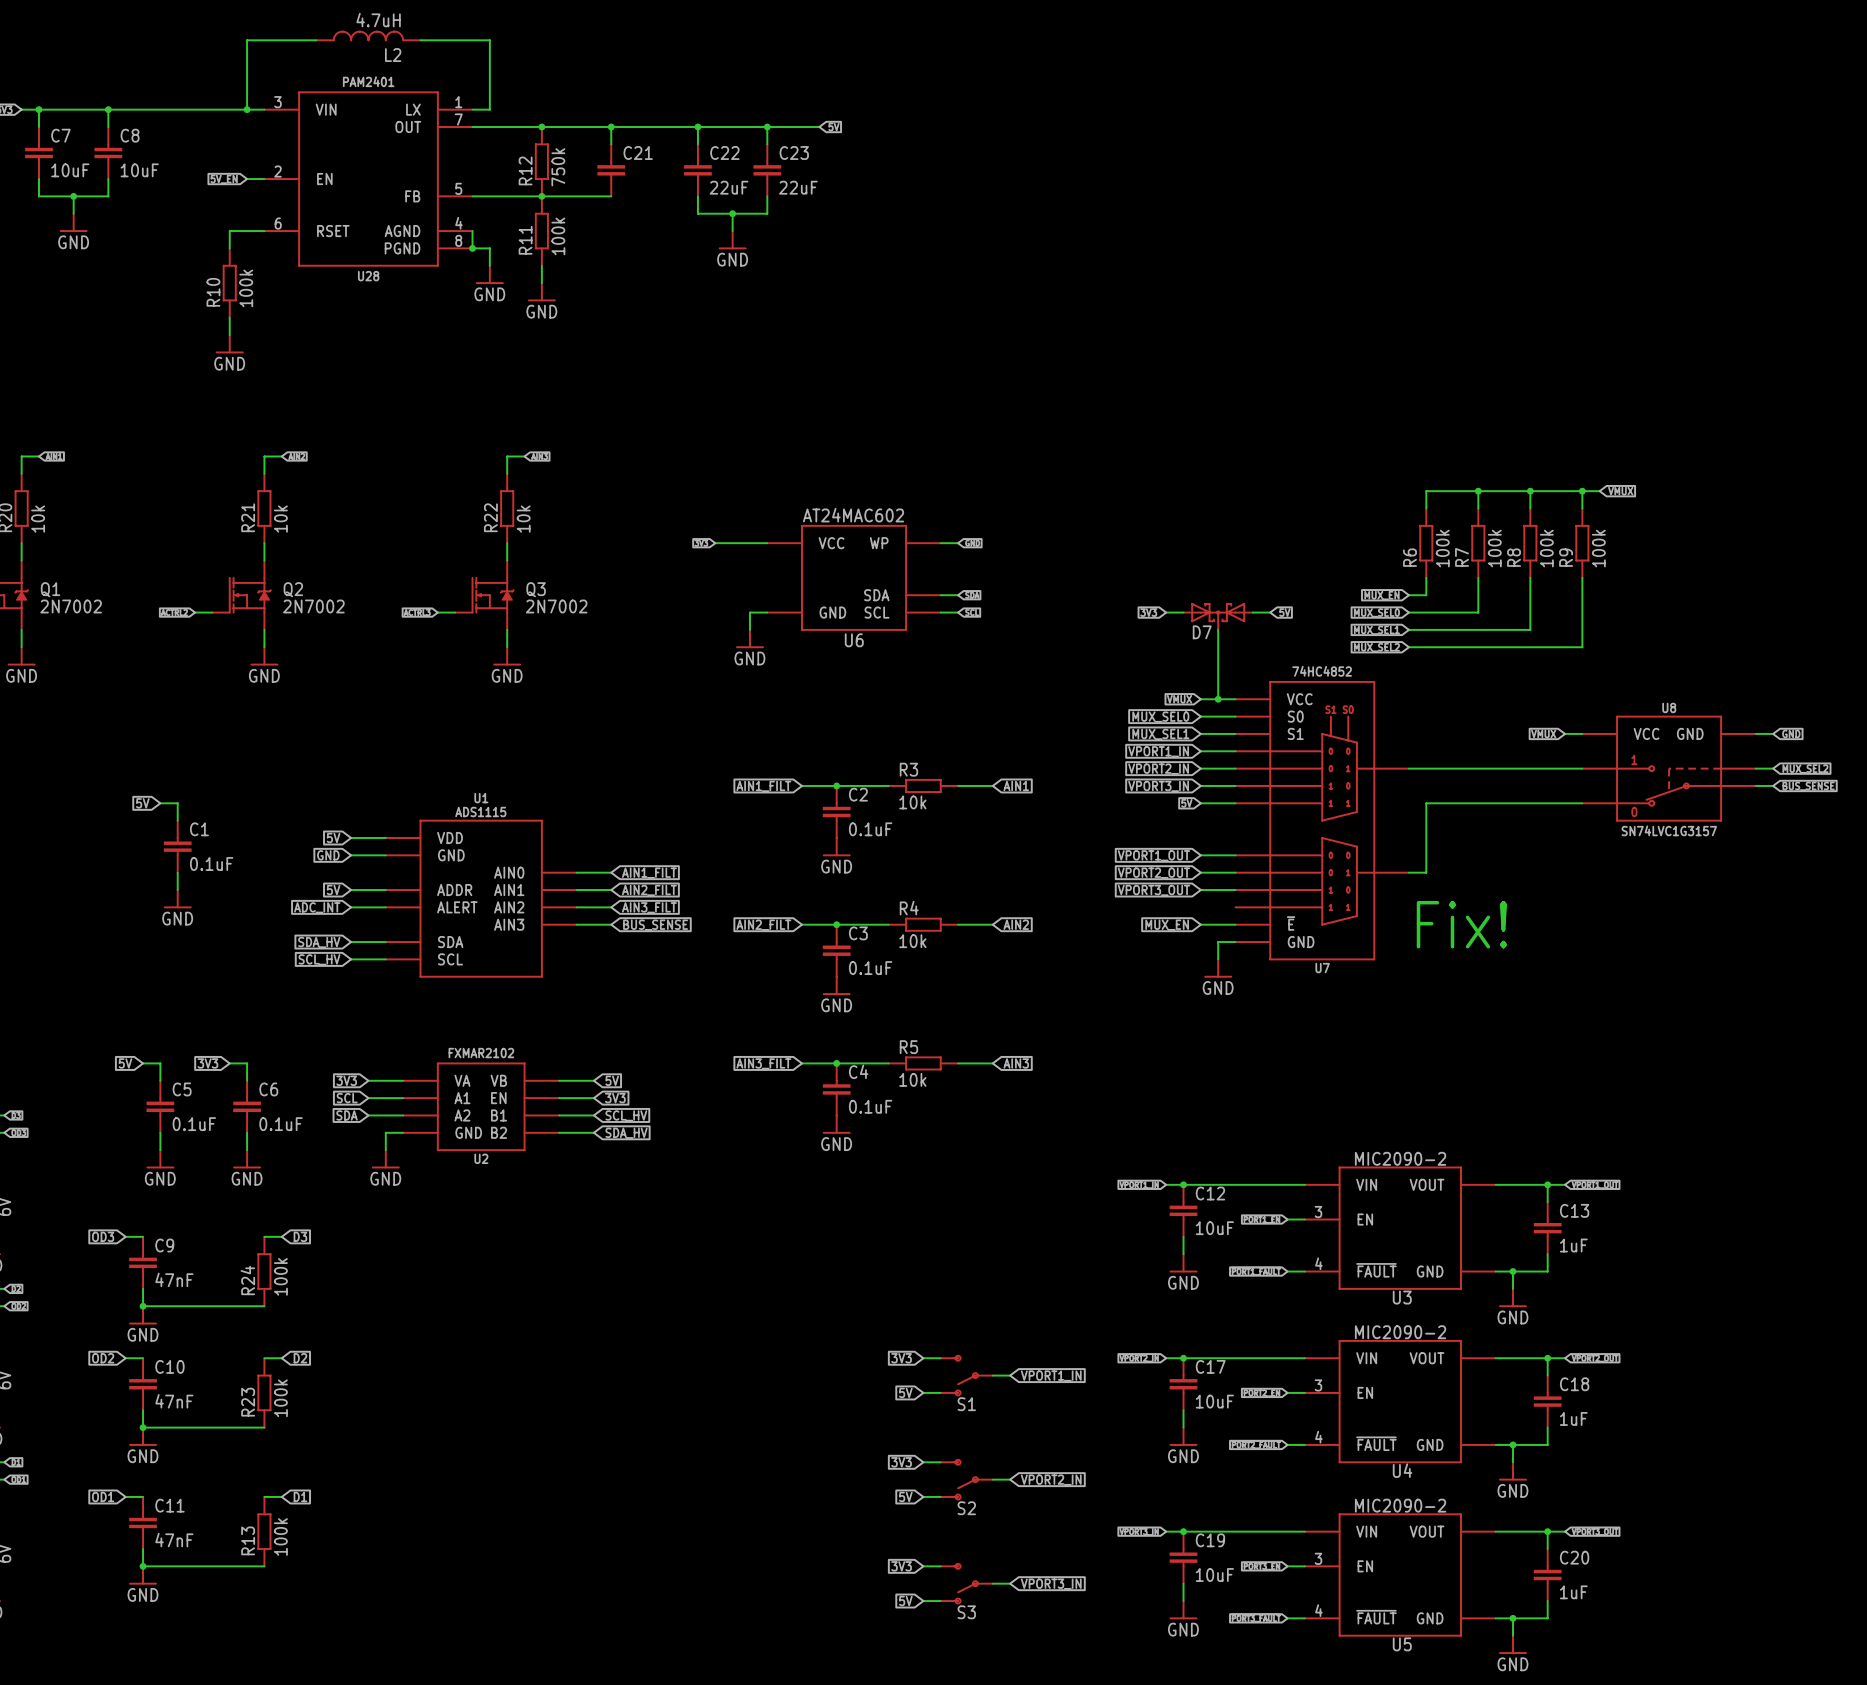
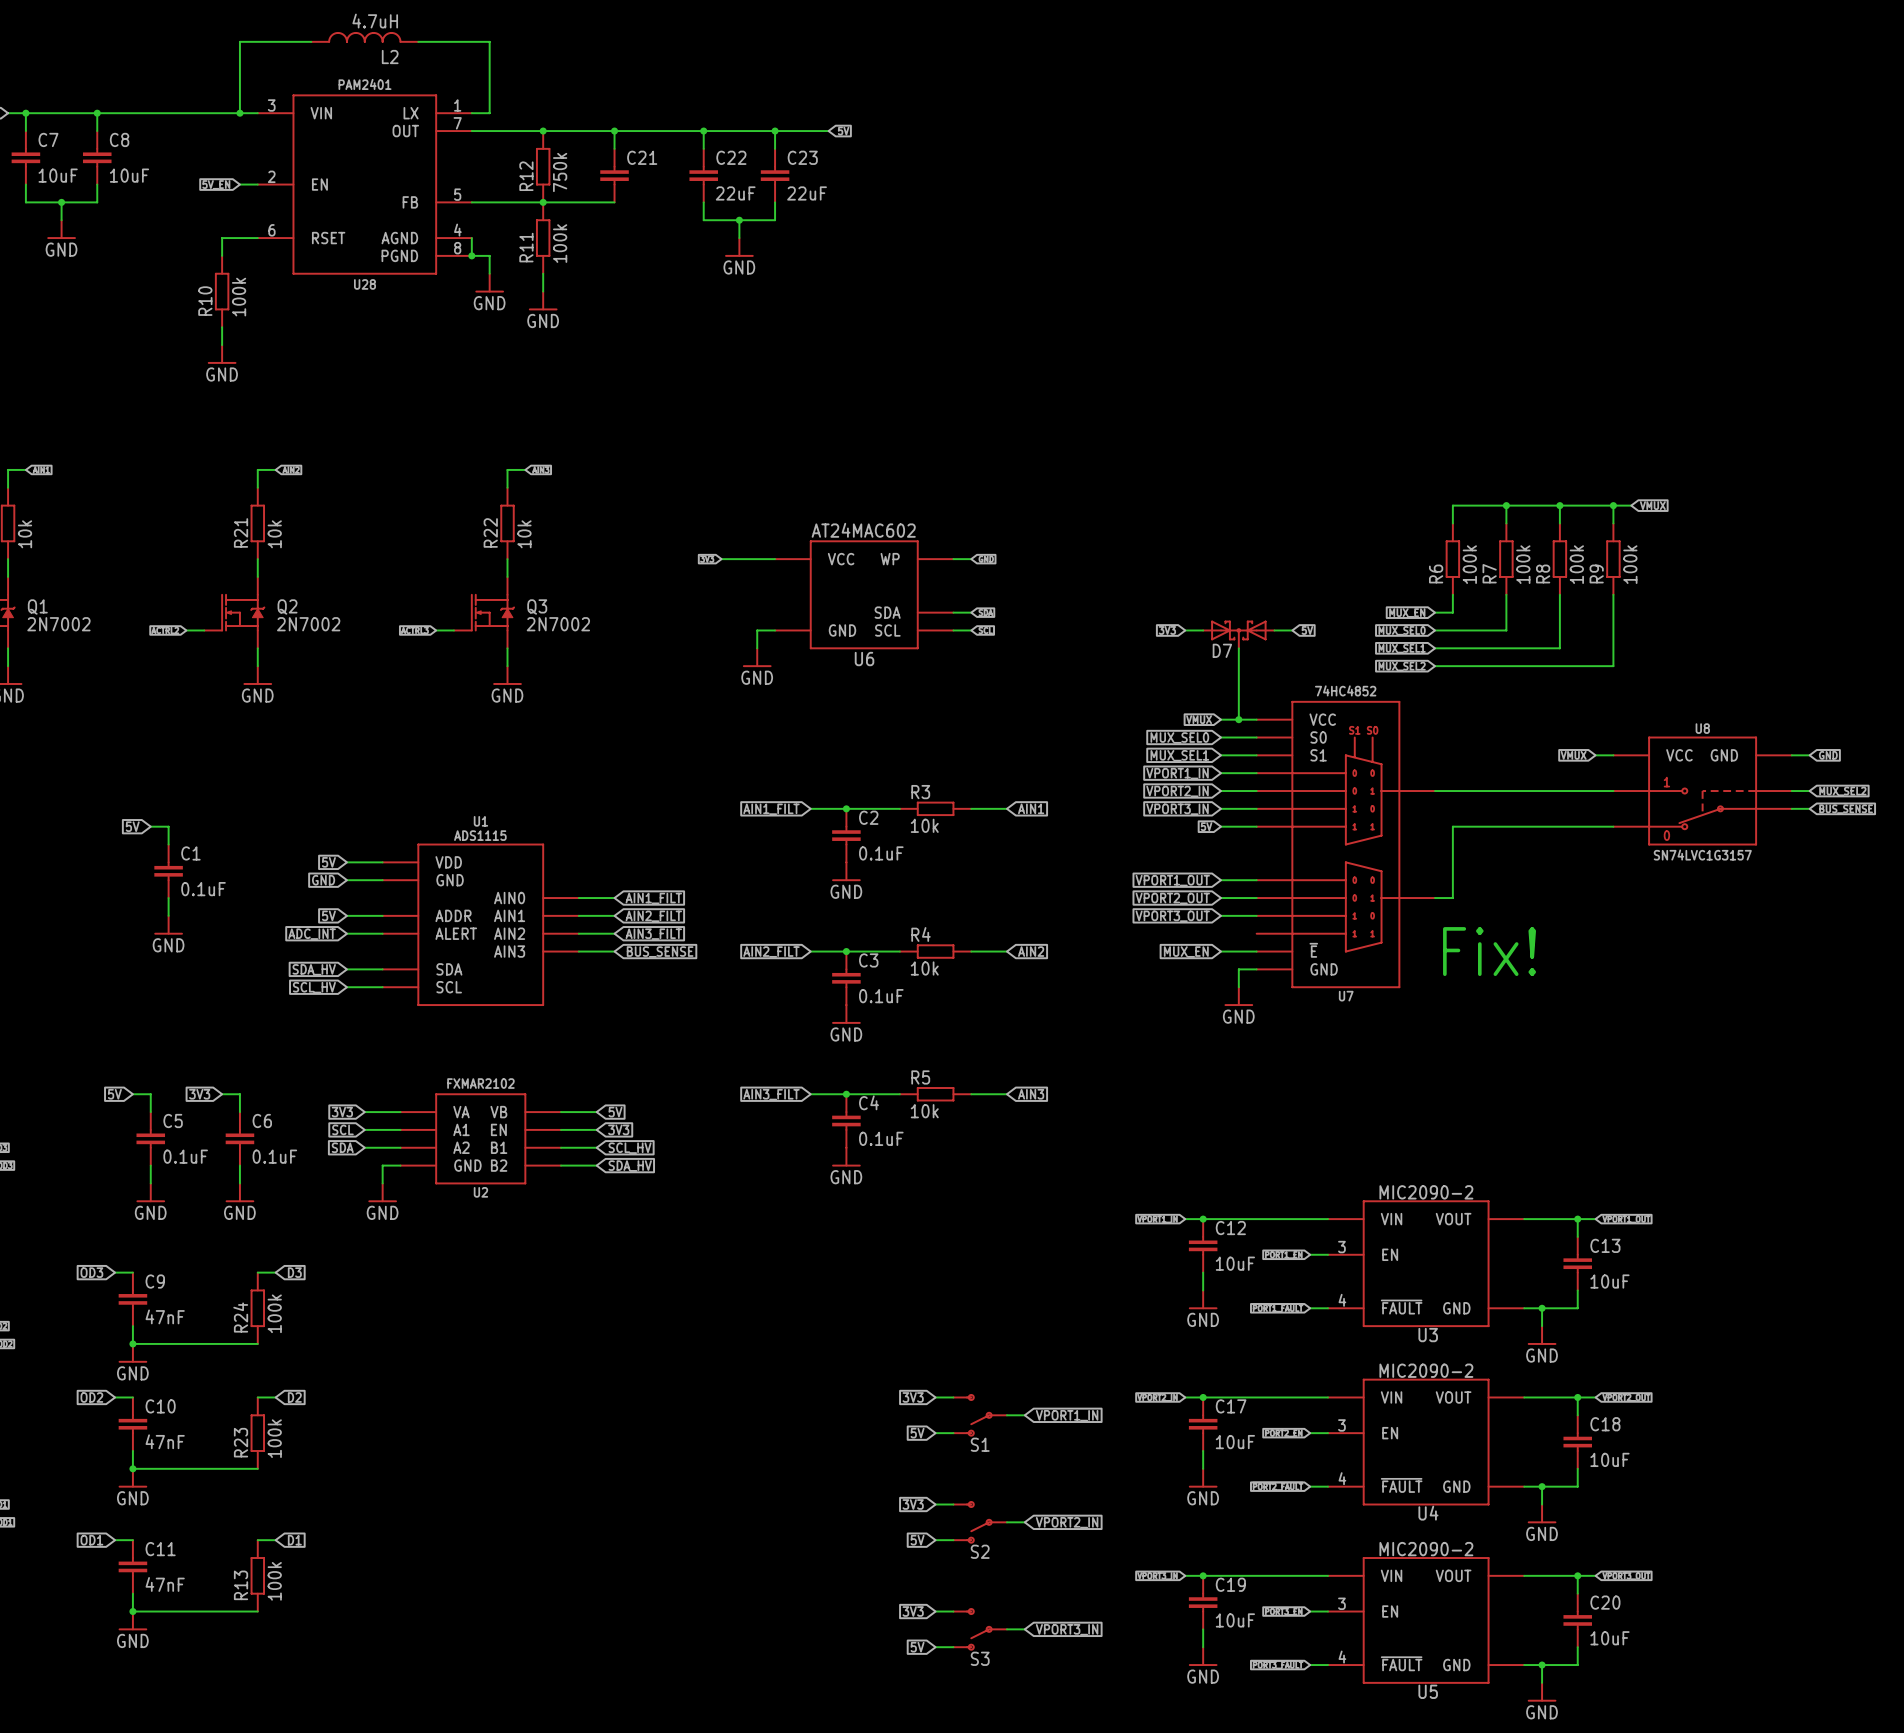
C13 value: 1uF (1573, 1245) -> 10uF (1609, 1281)
C18 value: 1uF (1573, 1418) -> 10uF (1609, 1459)
C20 value: 1uF (1573, 1592) -> 10uF (1609, 1638)

